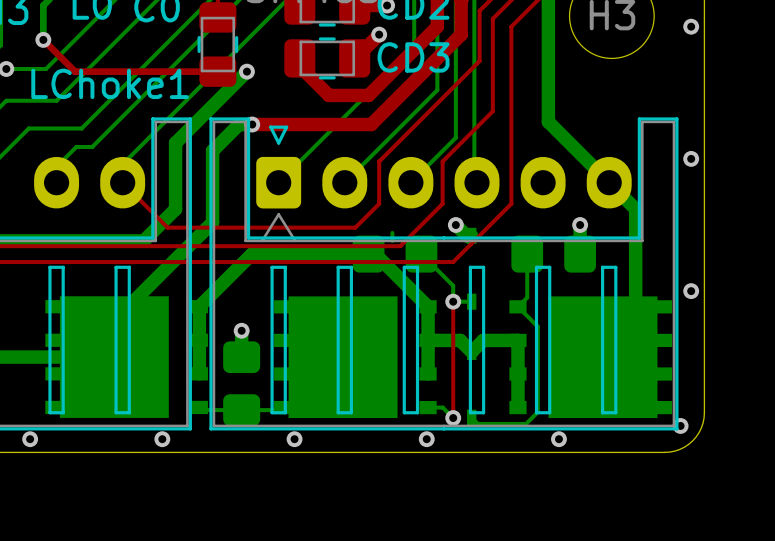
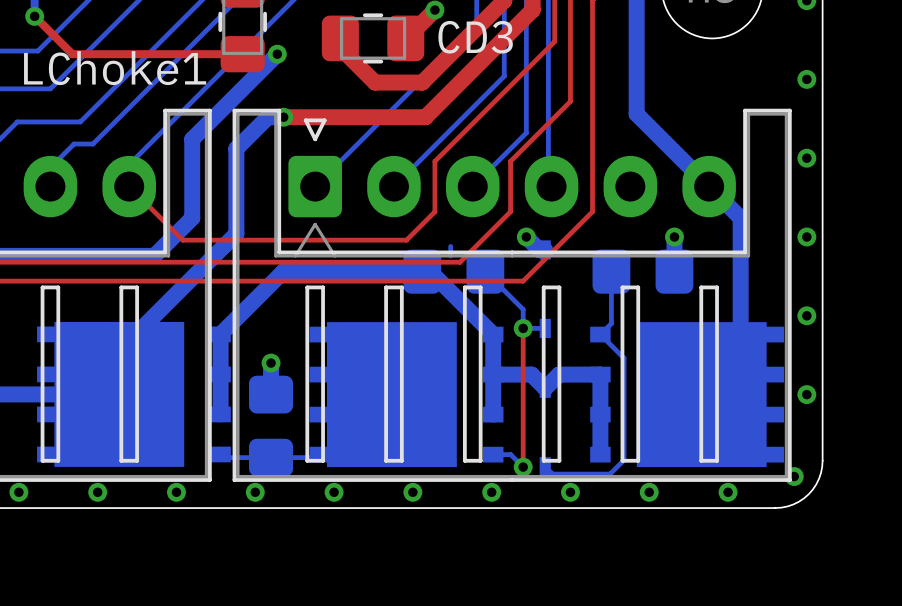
via: none -> (806, 79)
via: none -> (806, 237)
via: none -> (806, 394)
via: none -> (97, 492)
via: none -> (255, 492)
via: none -> (412, 492)
via: none -> (570, 492)
via: none -> (728, 492)

